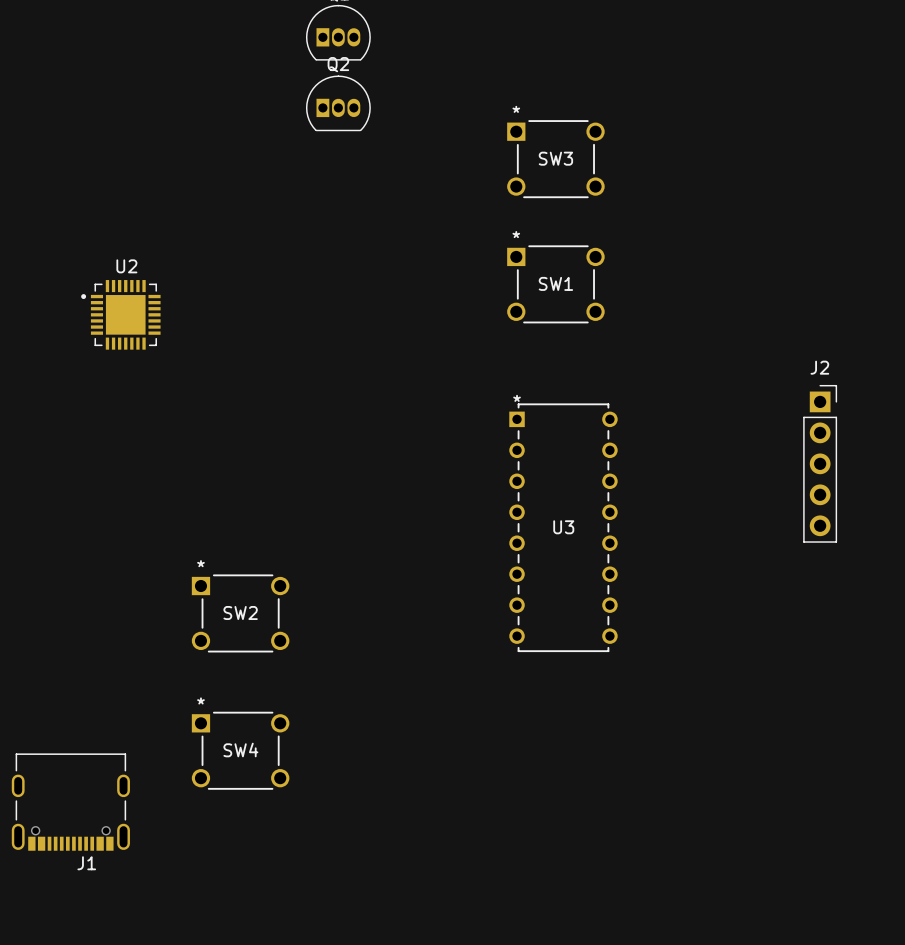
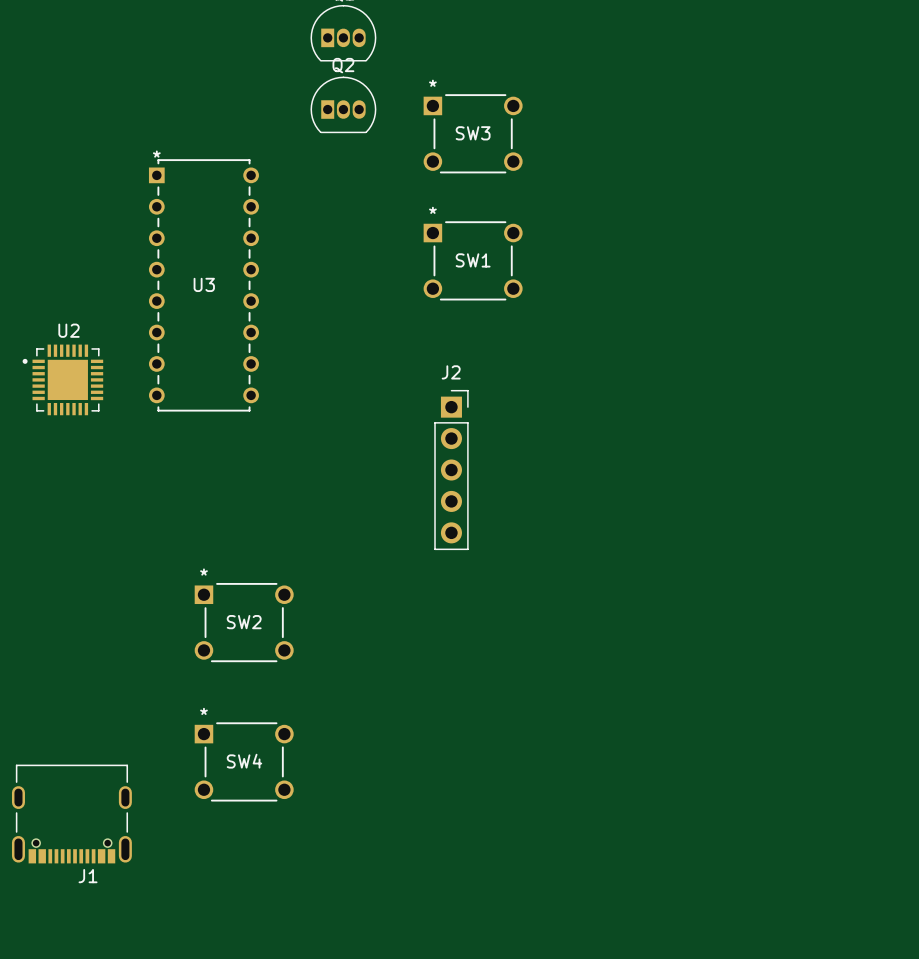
SW3 position: (555, 159) -> (473, 133)
SW1 position: (555, 284) -> (473, 260)
U2 position: (120, 314) -> (62, 379)
J2 position: (820, 463) -> (451, 470)
U3 position: (563, 527) -> (203, 285)

